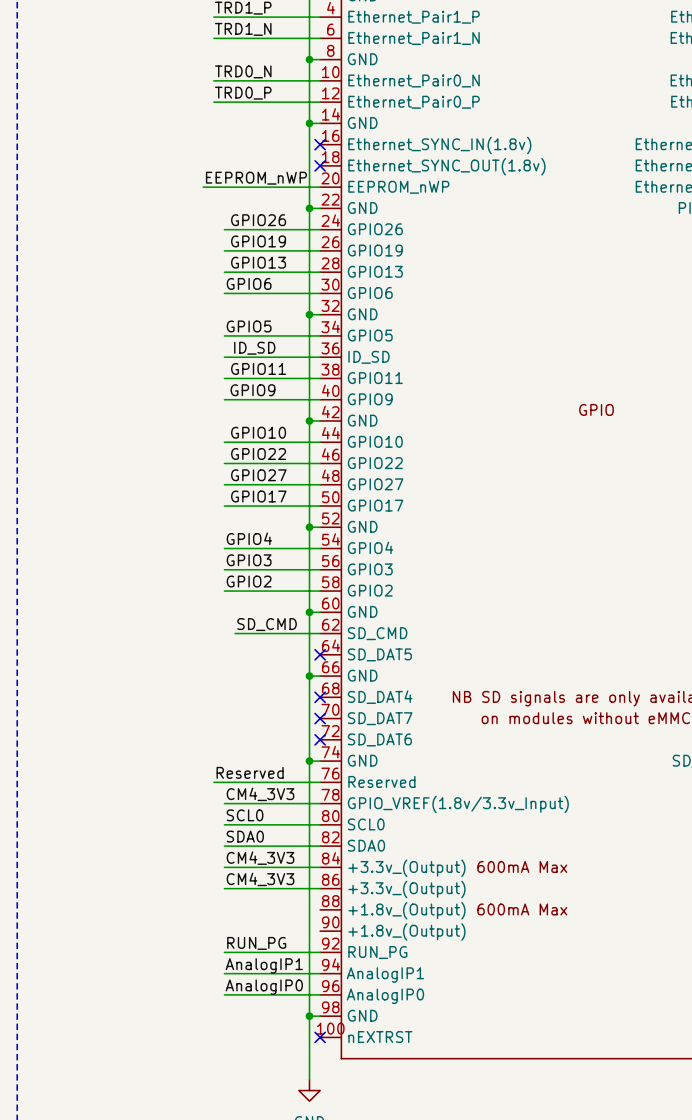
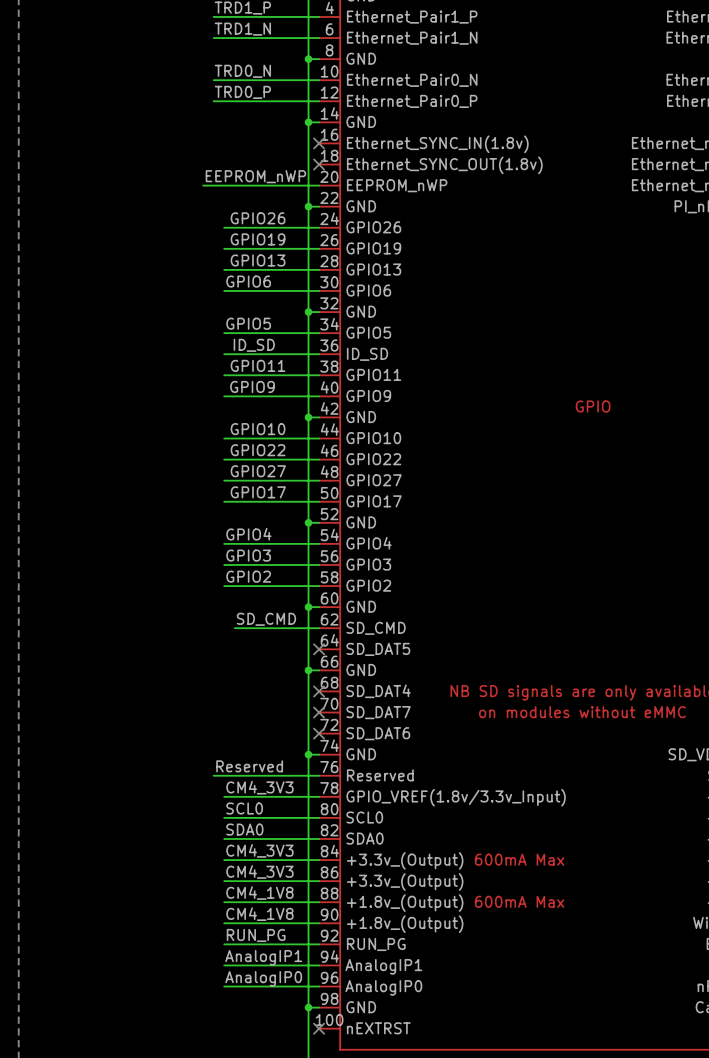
label: none -> CM4_1V8 (259, 893)
wire: none -> (224, 902) (319, 902)
label: none -> CM4_1V8 (259, 914)
wire: none -> (224, 923) (319, 923)

